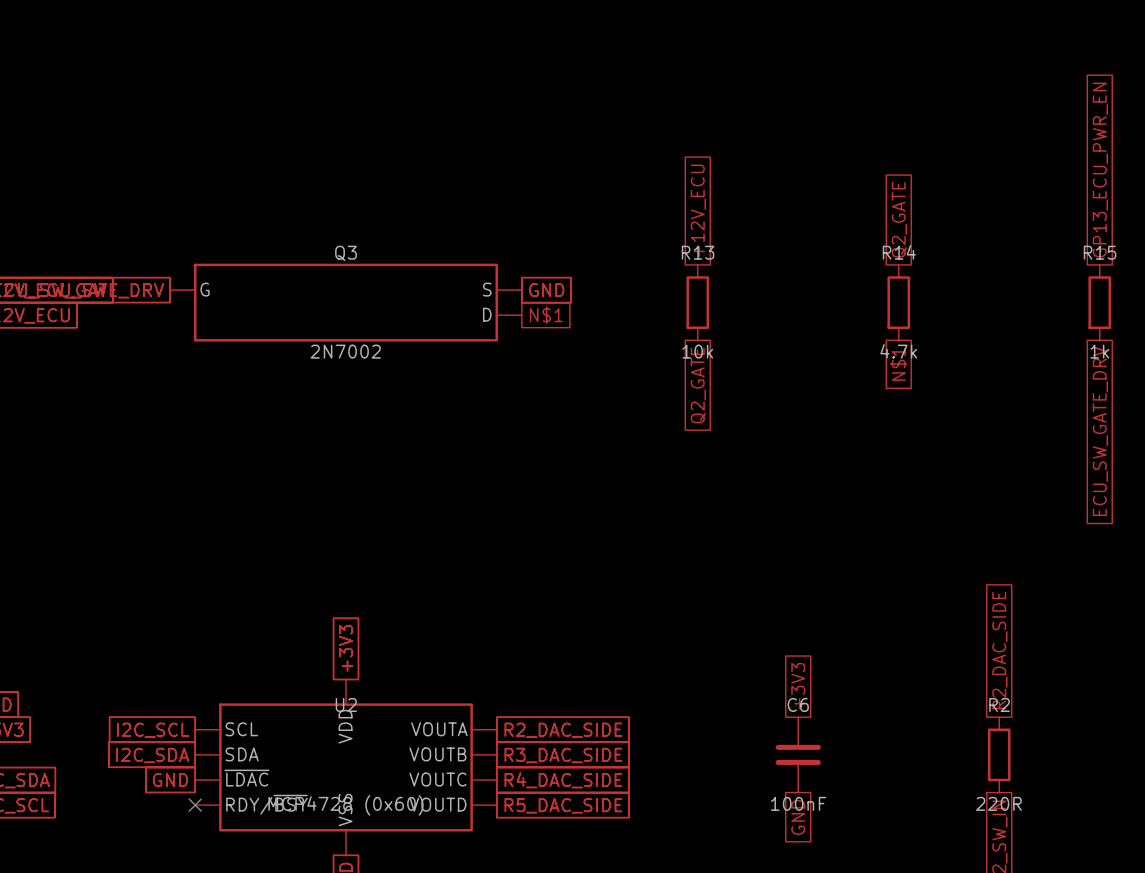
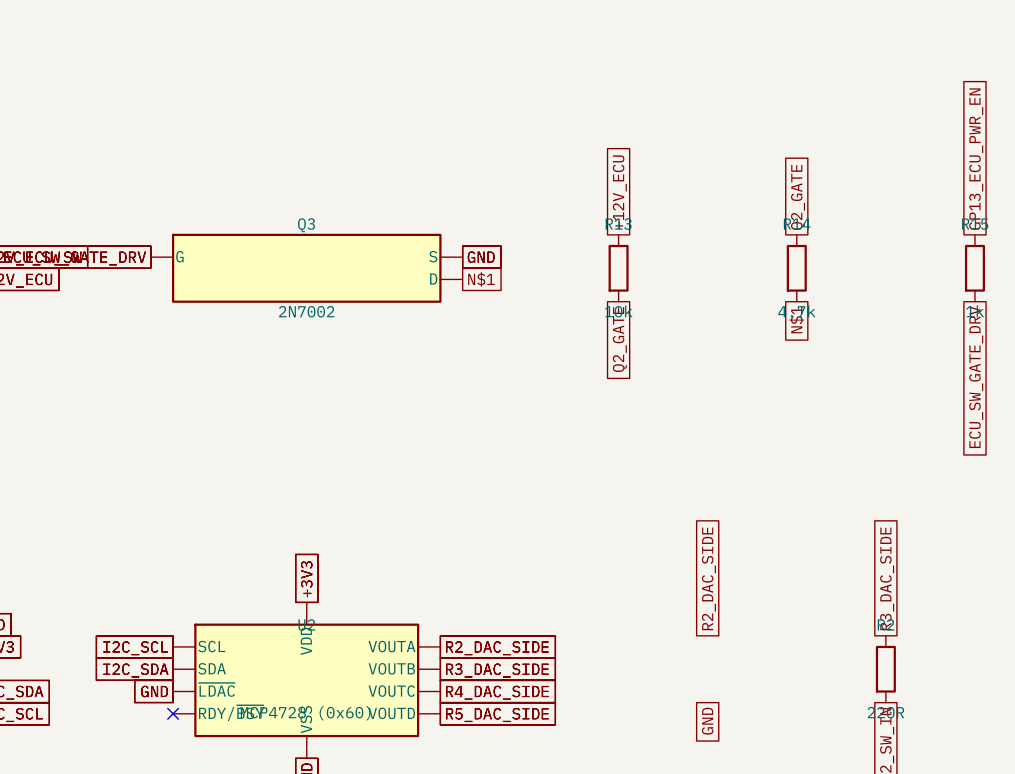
global label: R2_DAC_SIDE (999, 650) -> R3_DAC_SIDE (887, 578)
global label: +3V3 (798, 686) -> R2_DAC_SIDE (708, 578)
C6: 100nF (798, 754) -> none

